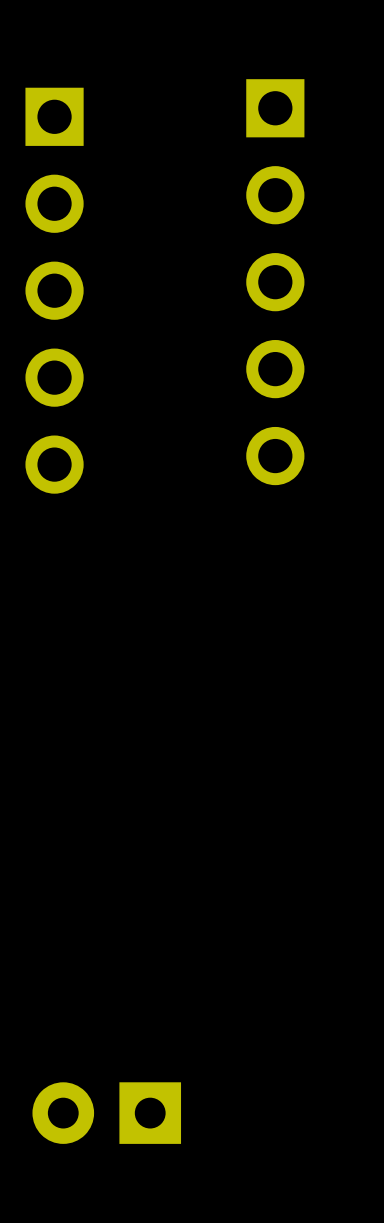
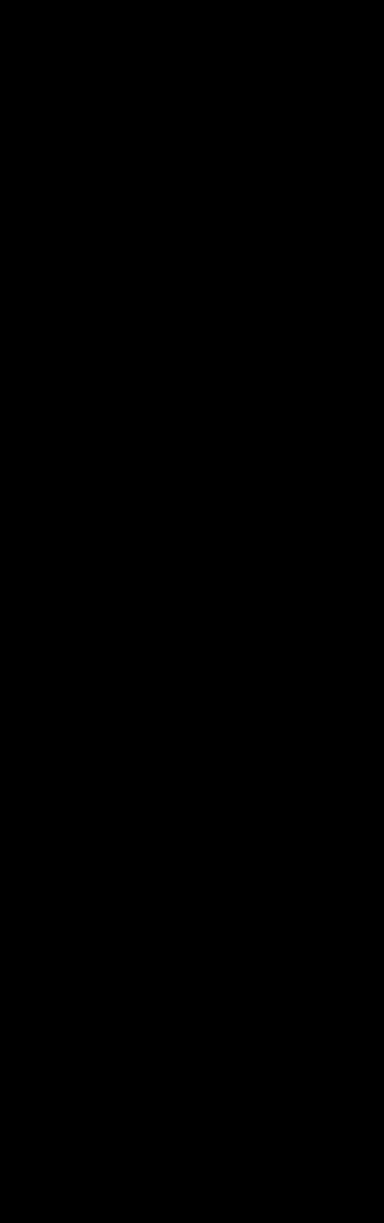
part: (275, 282) -> none
part: (54, 290) -> none
part: (106, 1113) -> none

